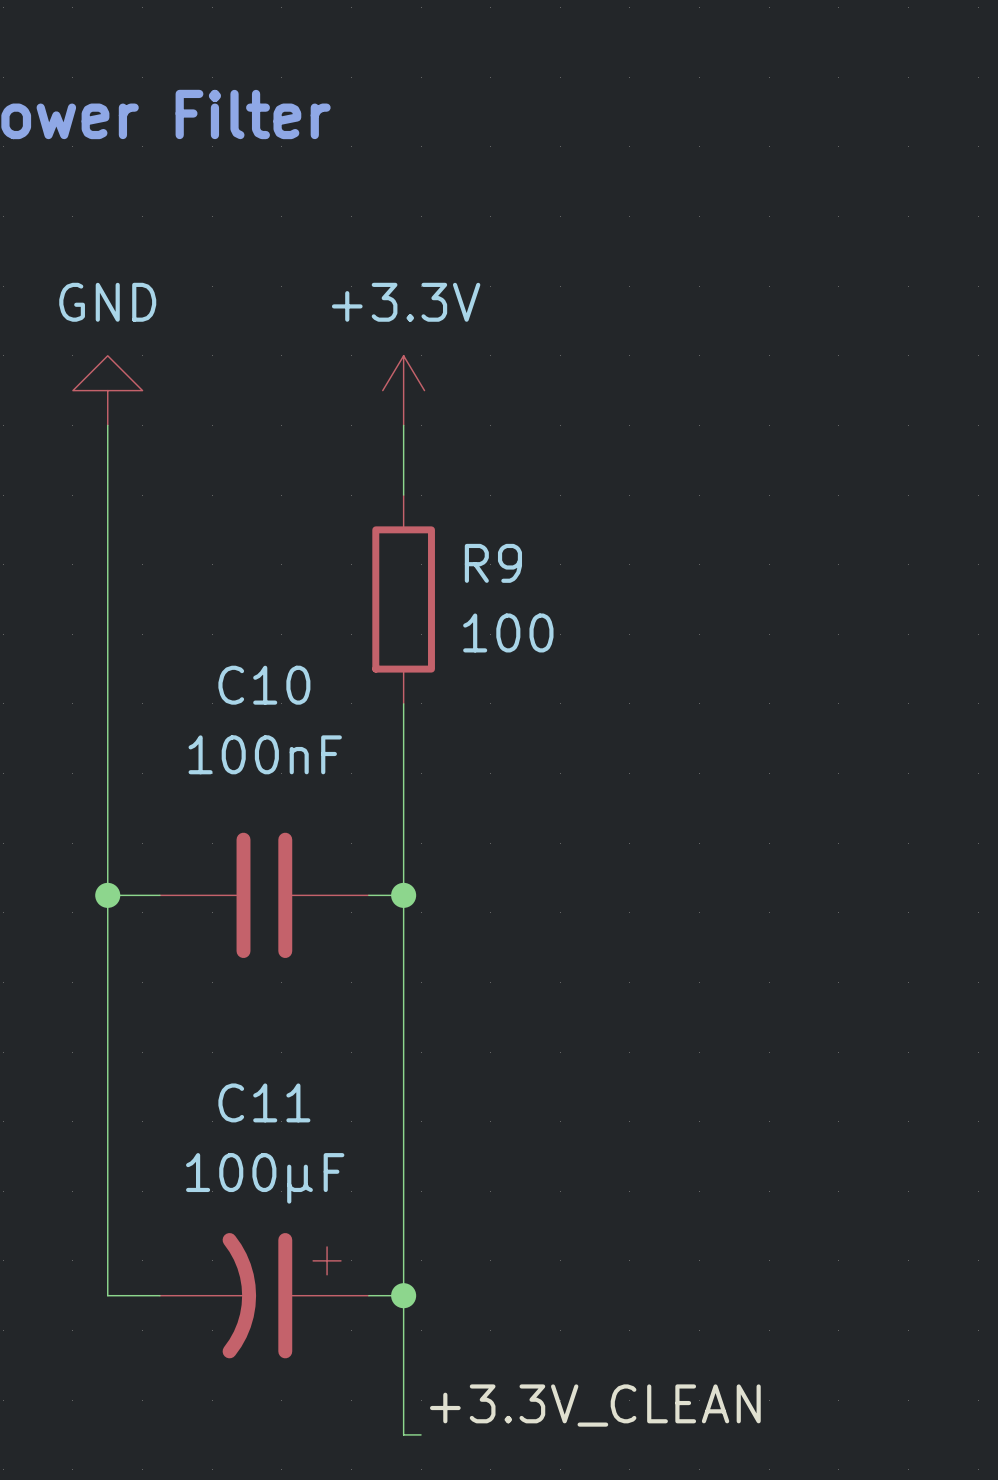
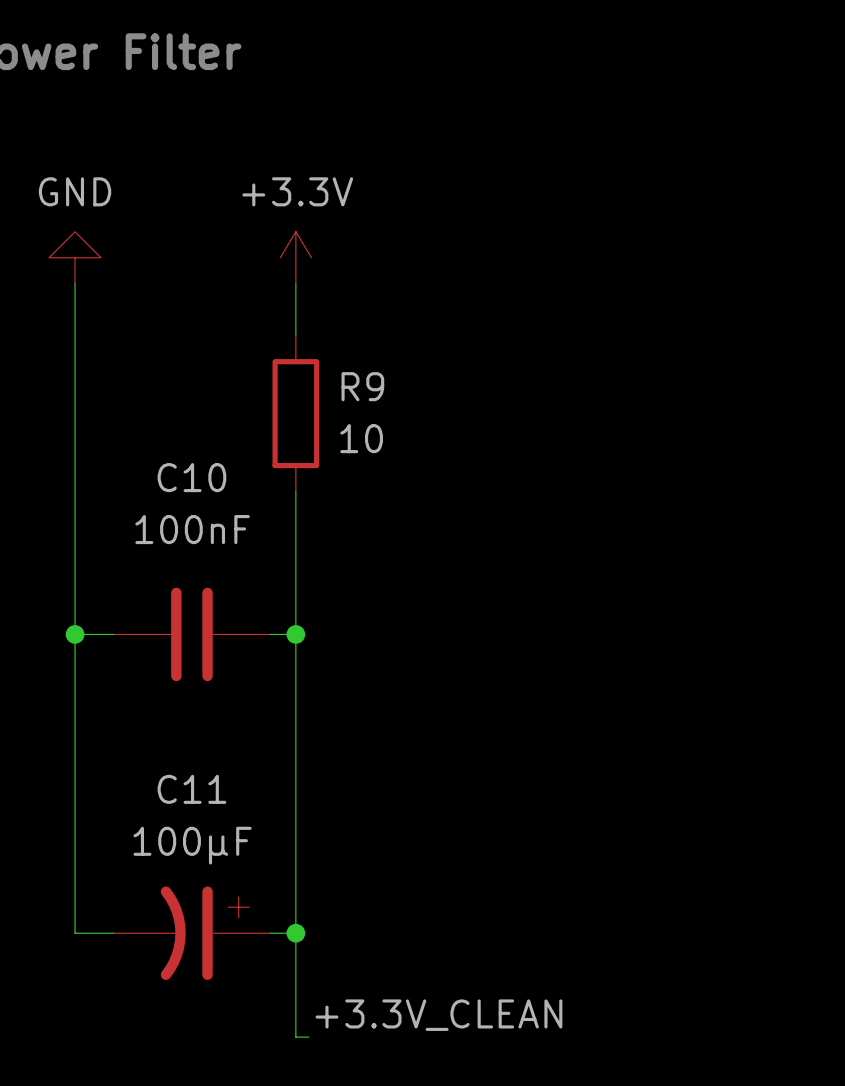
R9 value: 100 (508, 632) -> 10 (361, 438)

